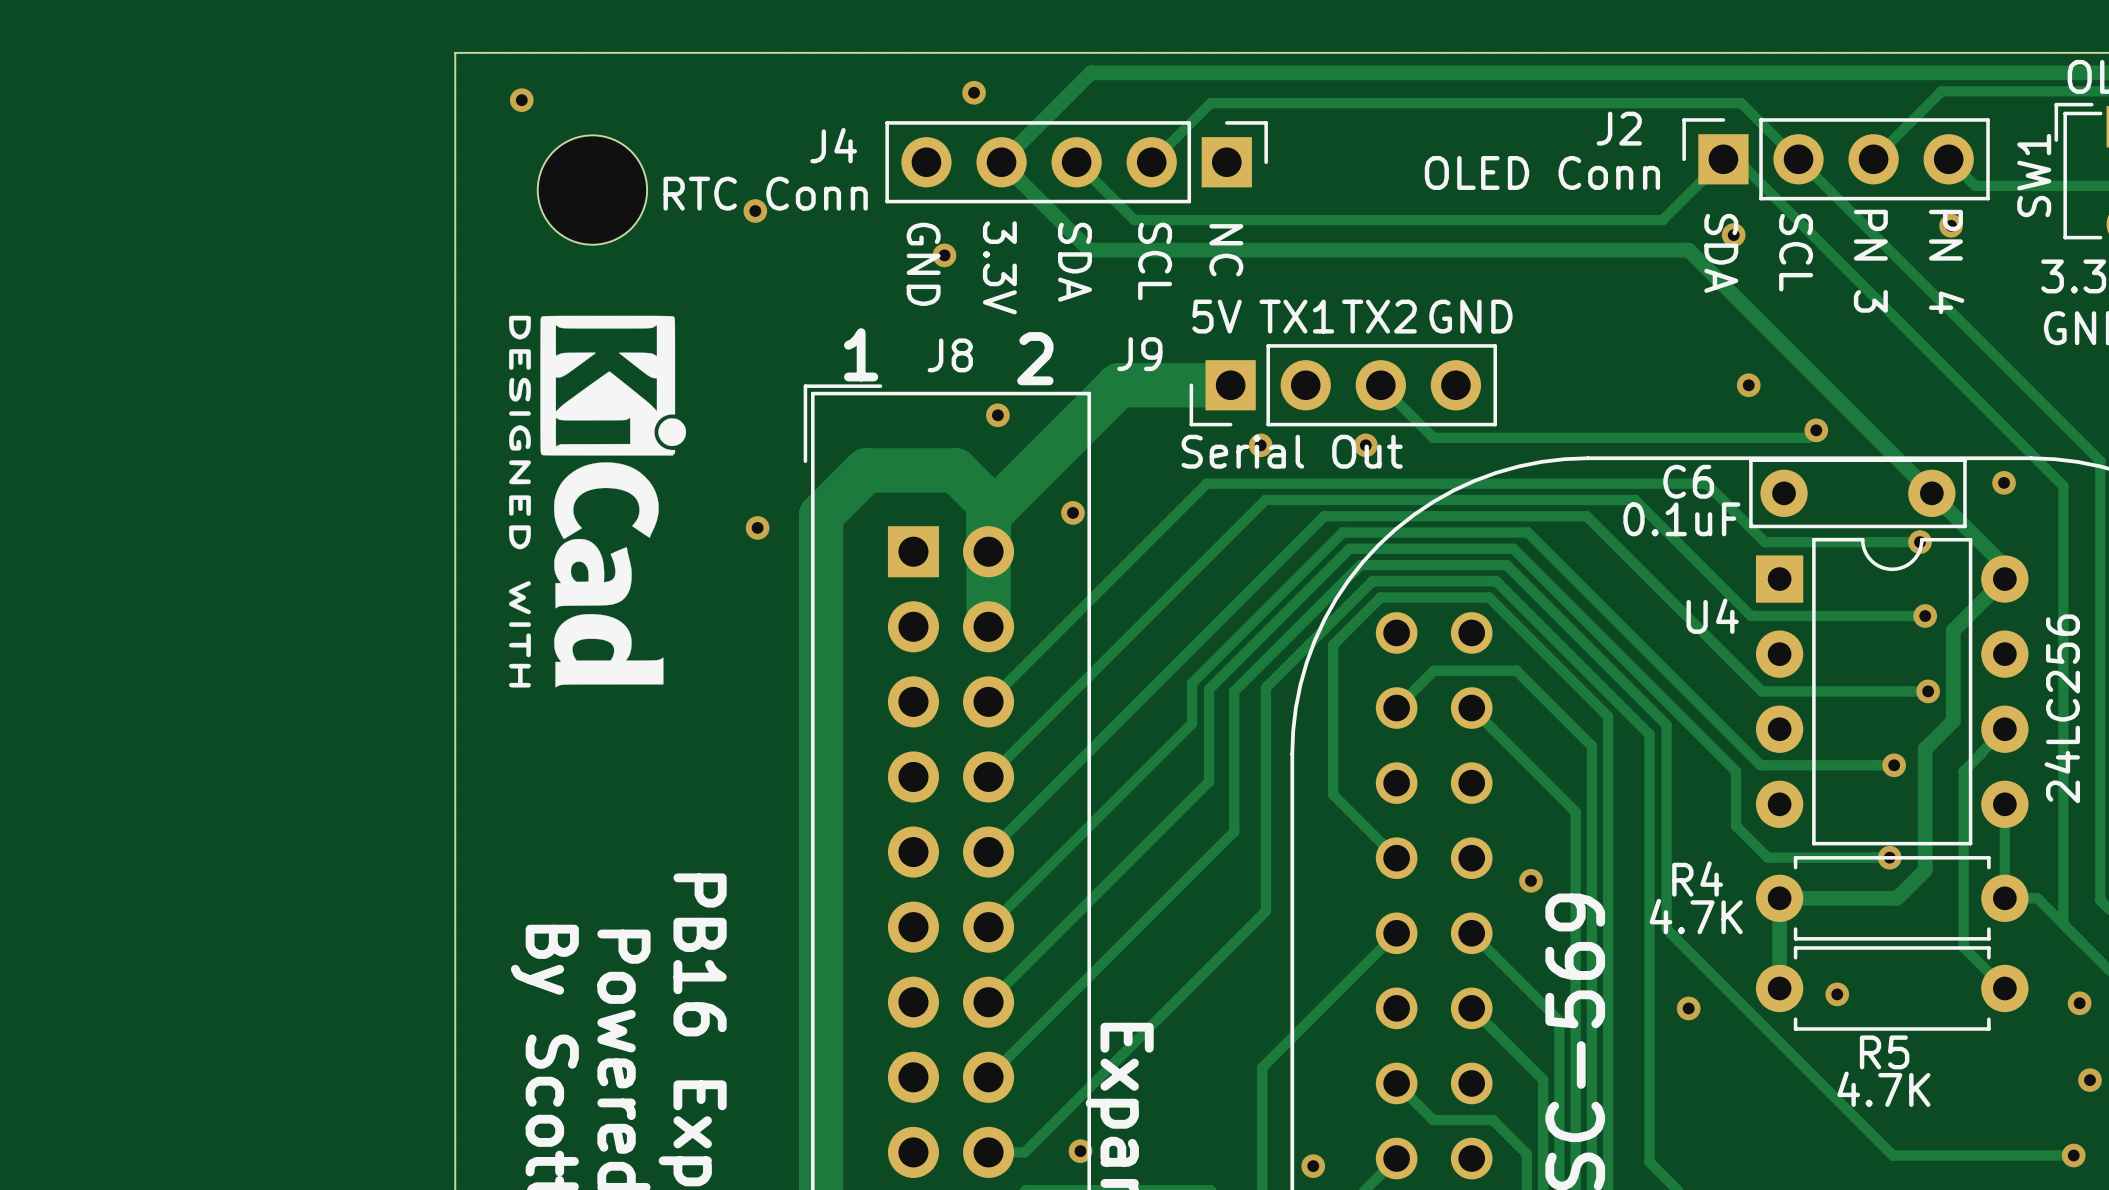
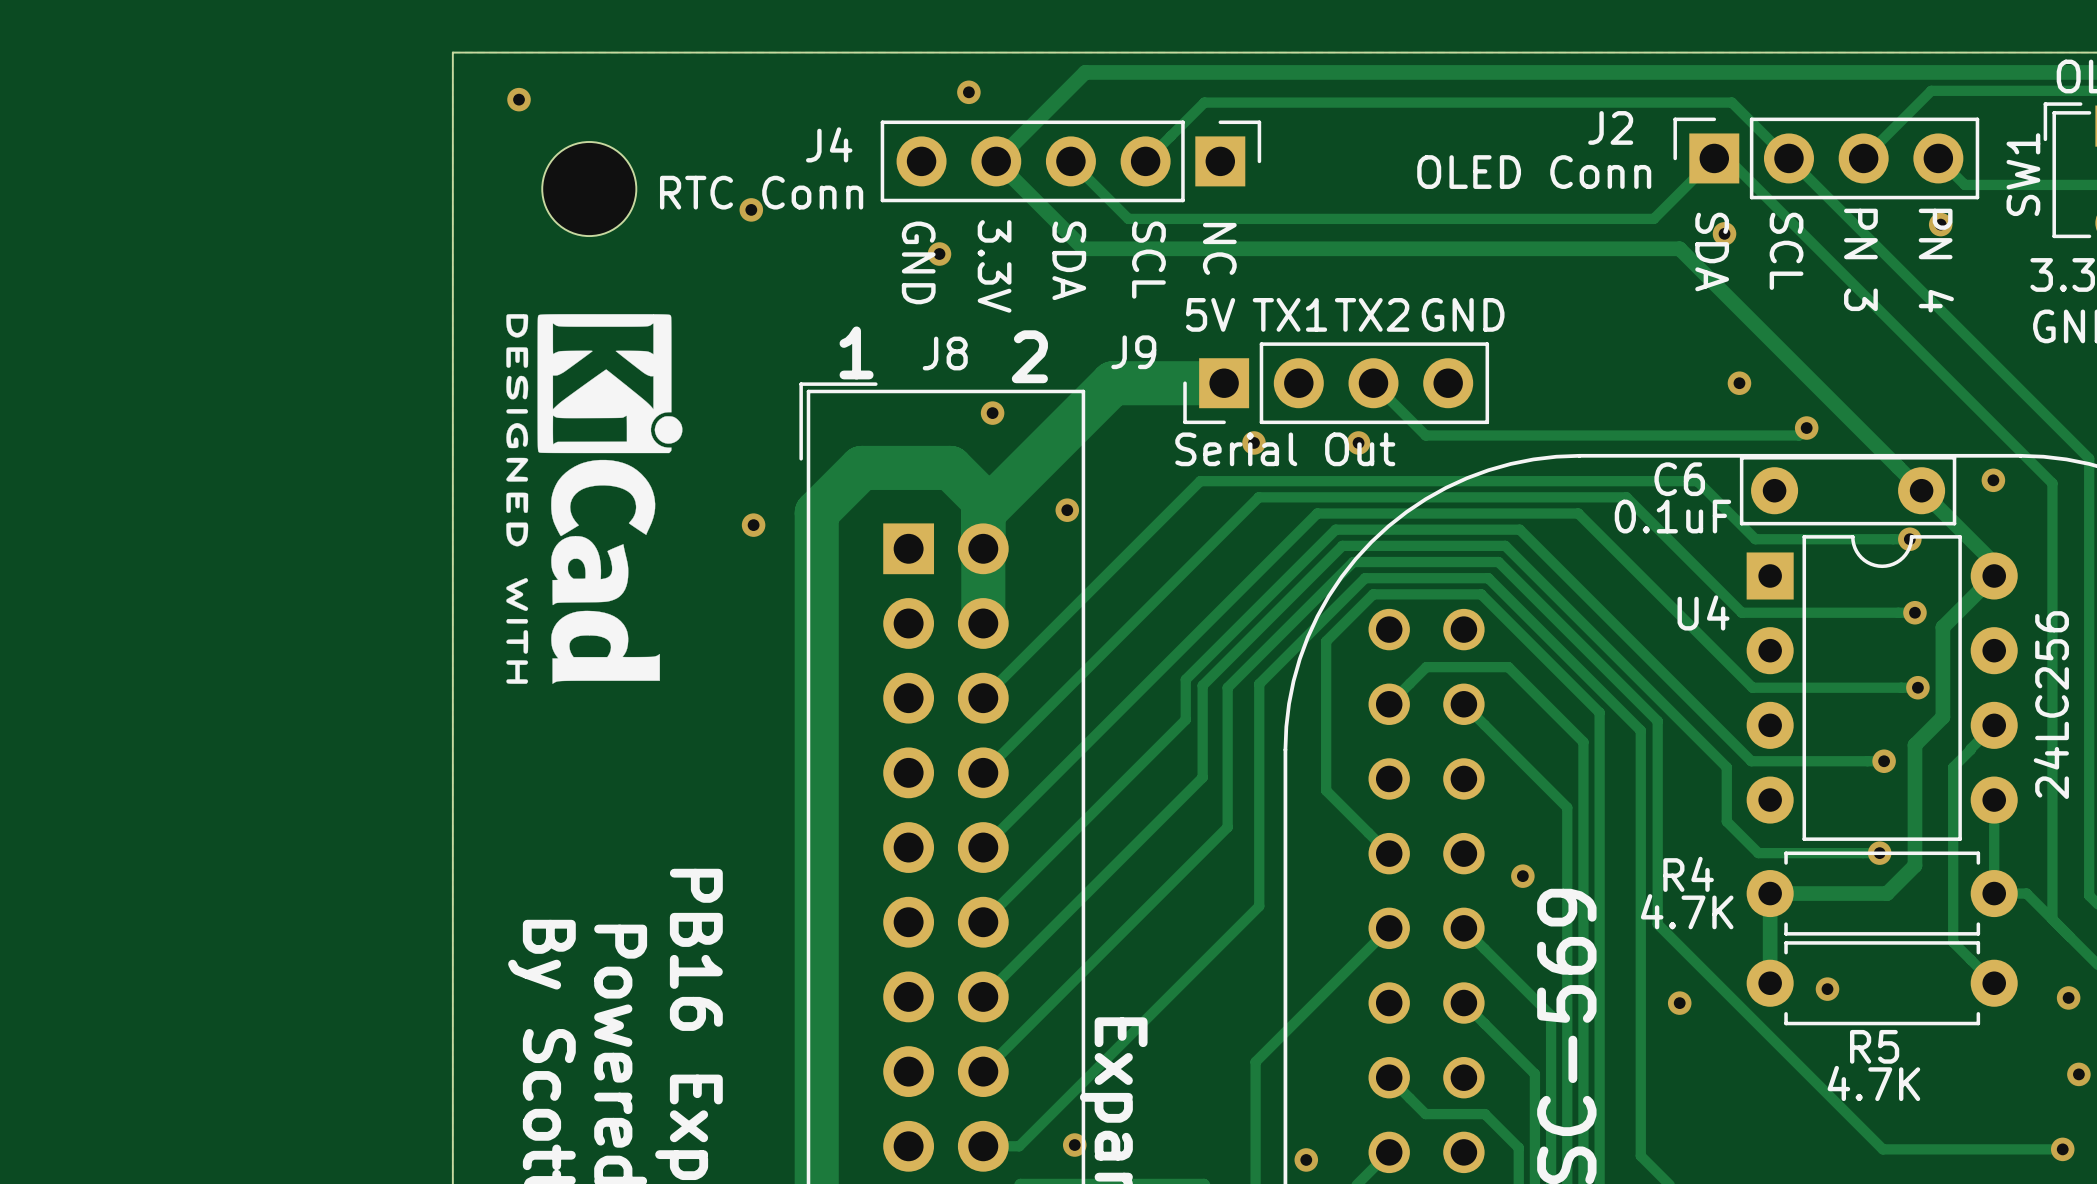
part footprint: [537, 135, 648, 245] -> [542, 141, 637, 237]

